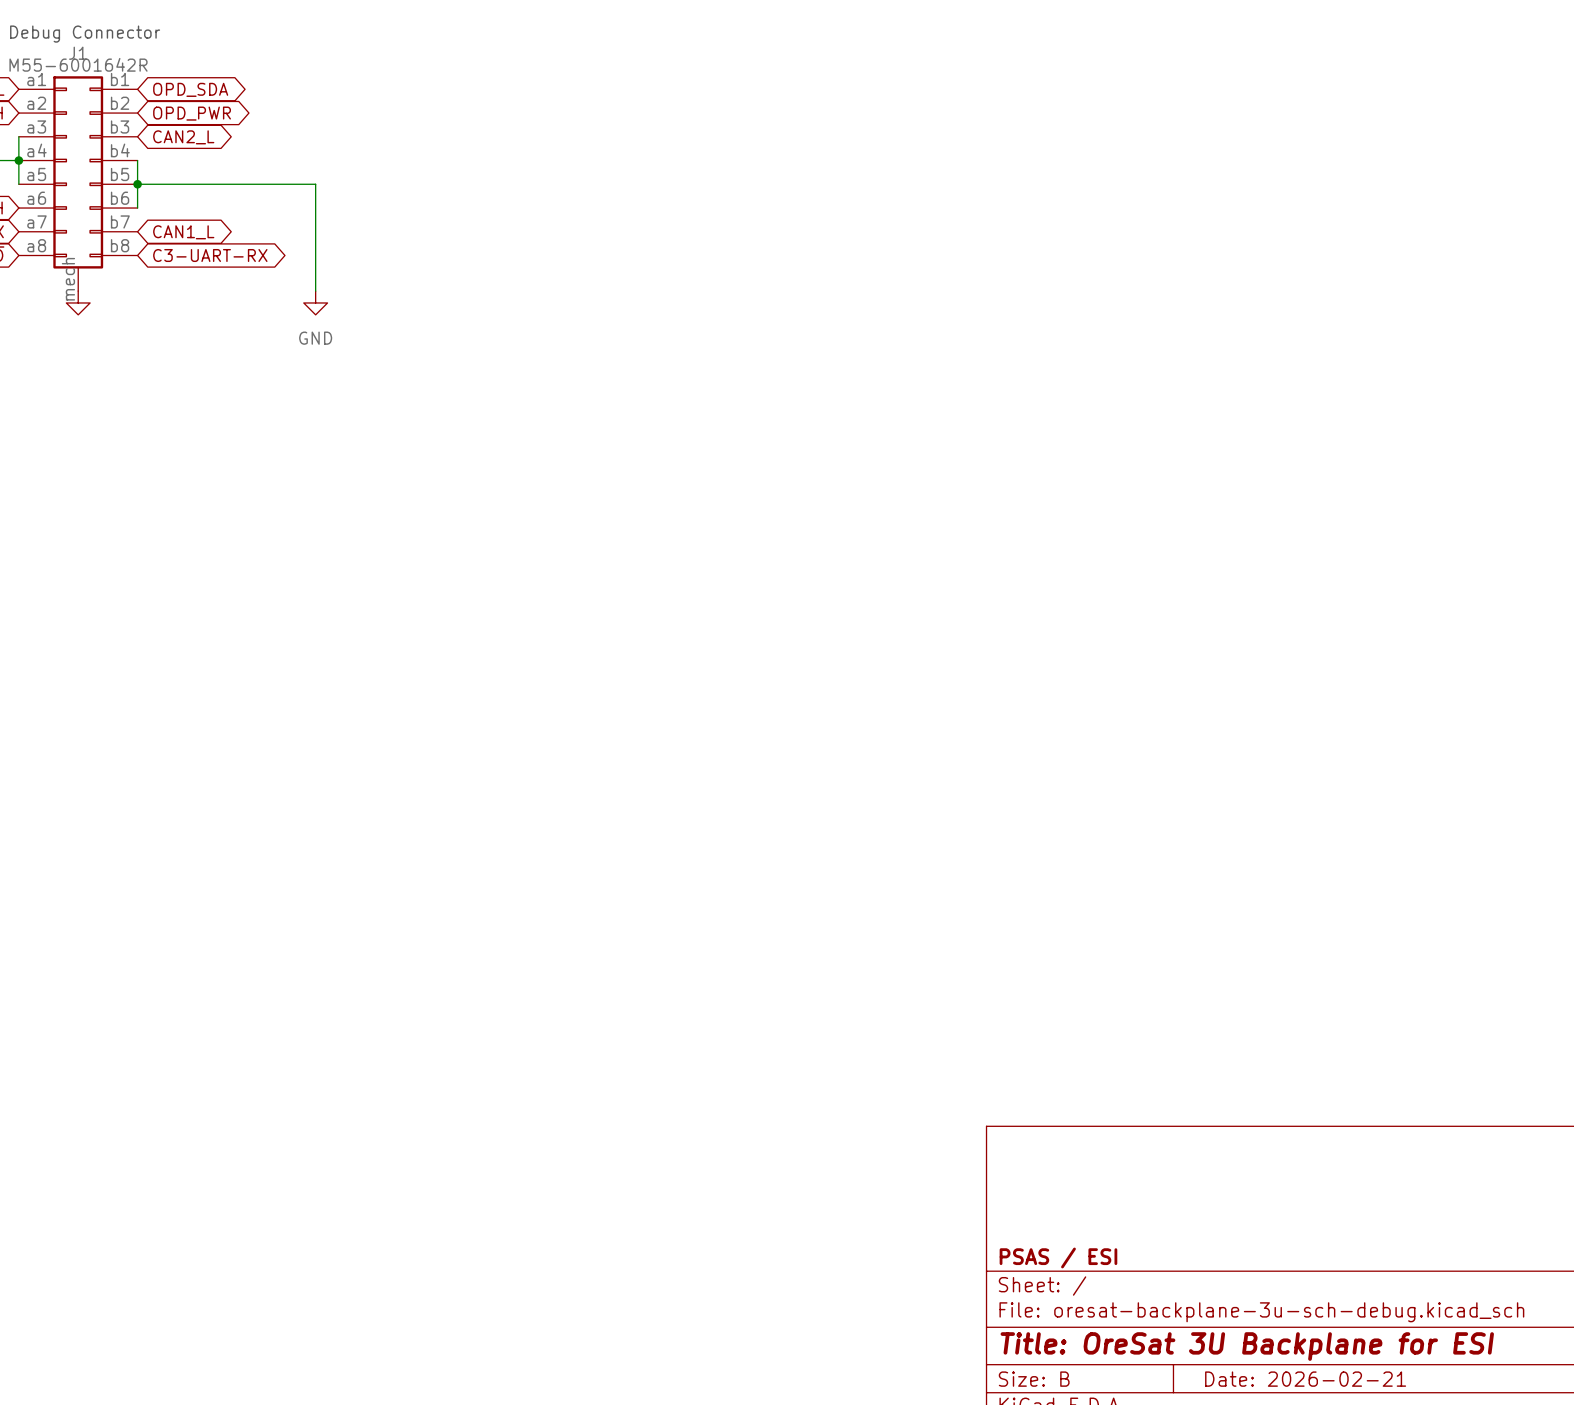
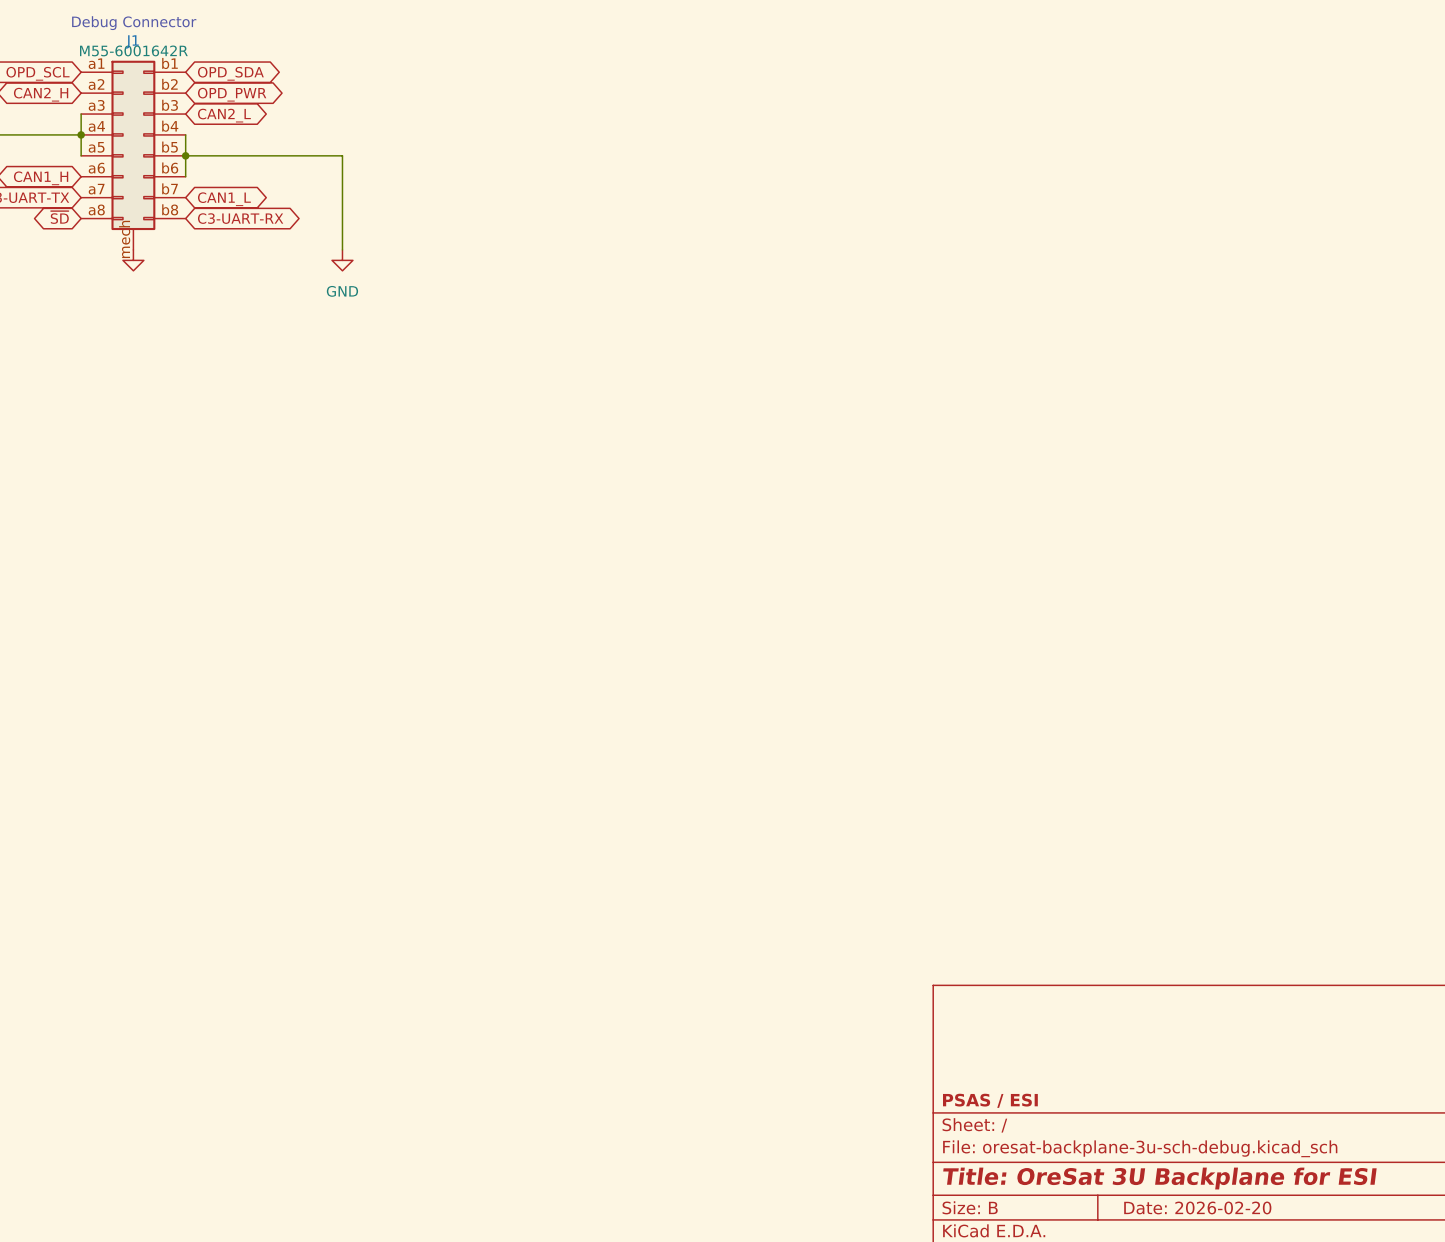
title block: Date: 2026-02-21 (1305, 1379) -> Date: 2026-02-20 (1197, 1207)

